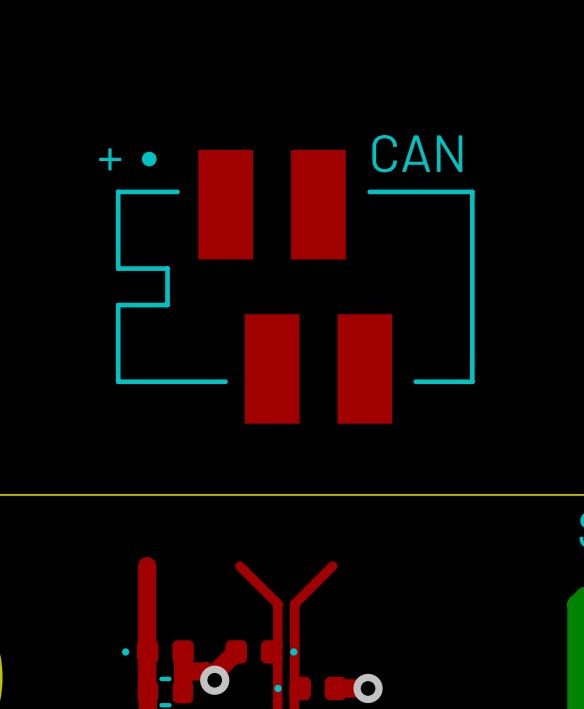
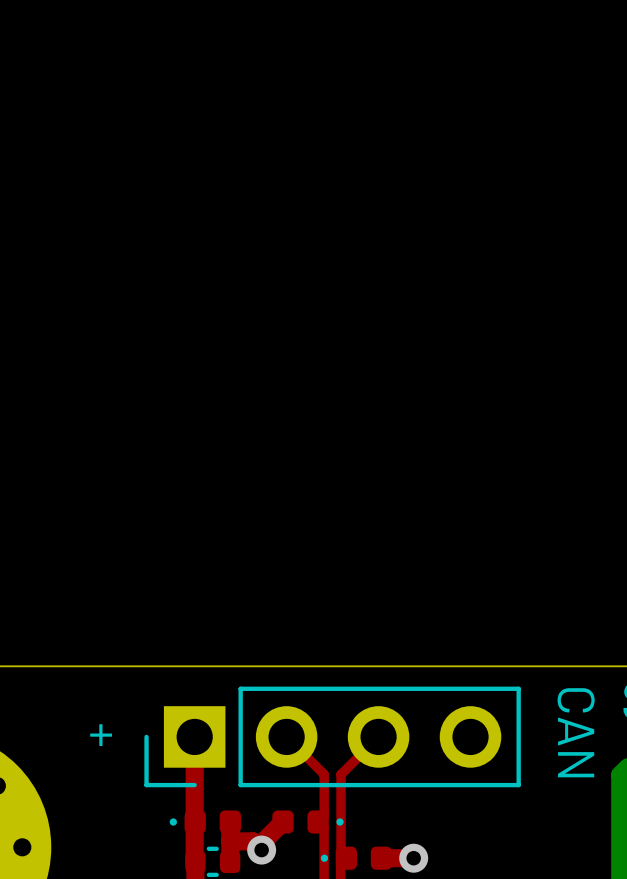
text rotation: 0° (417, 153) -> 90° clockwise (576, 732)
text position: CAN (417, 153) -> CAN (576, 732)
text position: + (110, 159) -> + (101, 735)
part: (295, 286) -> none
part: none -> (332, 736)

